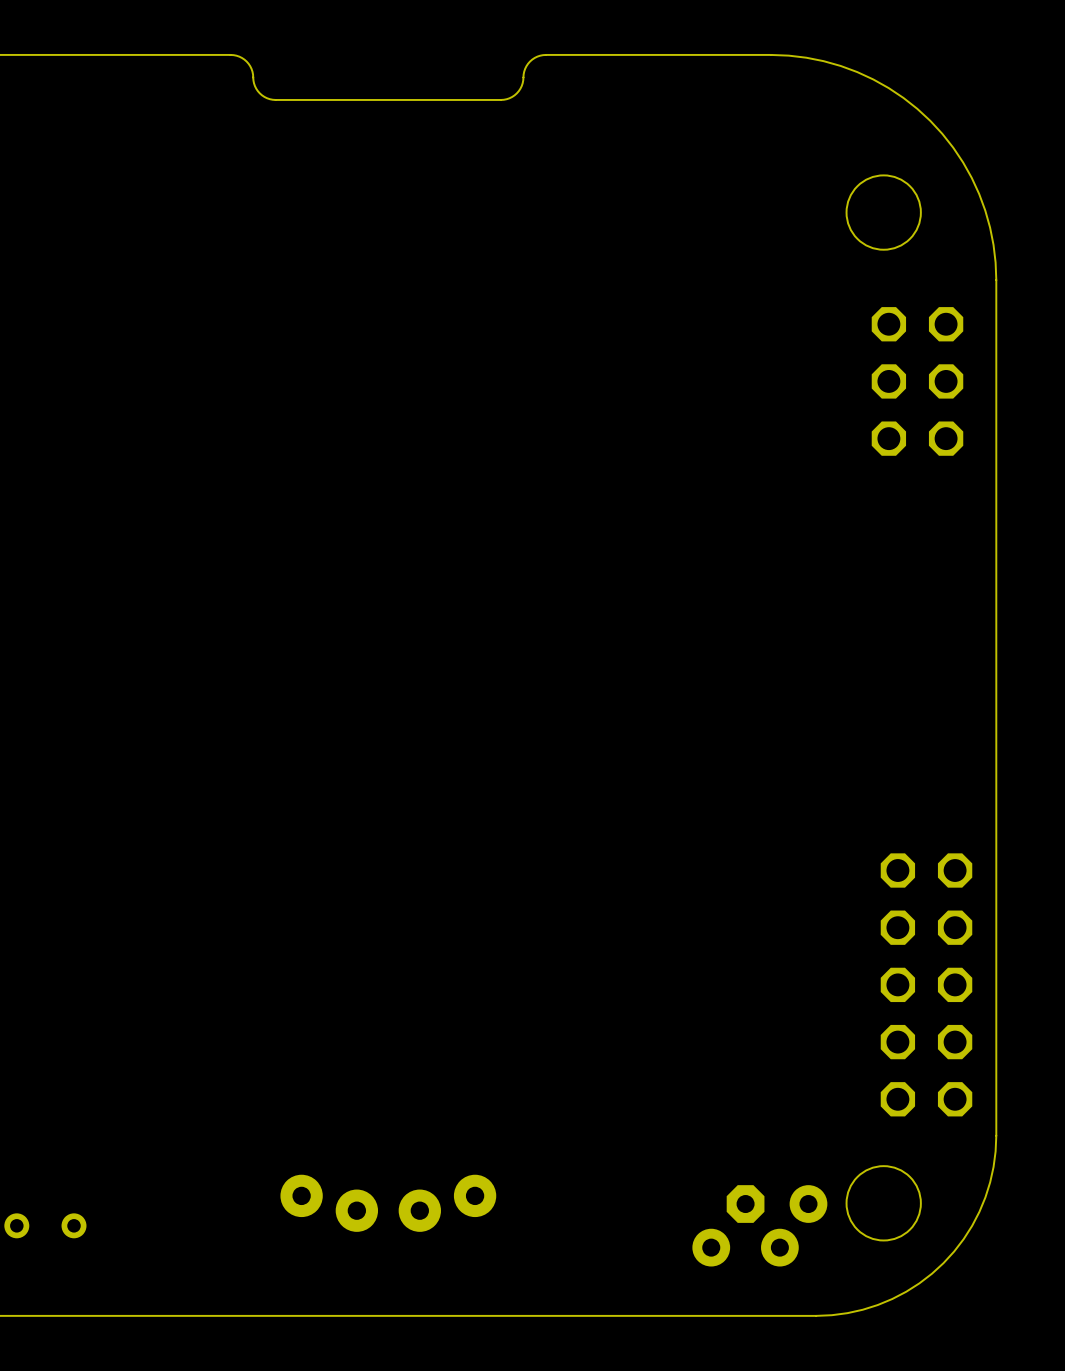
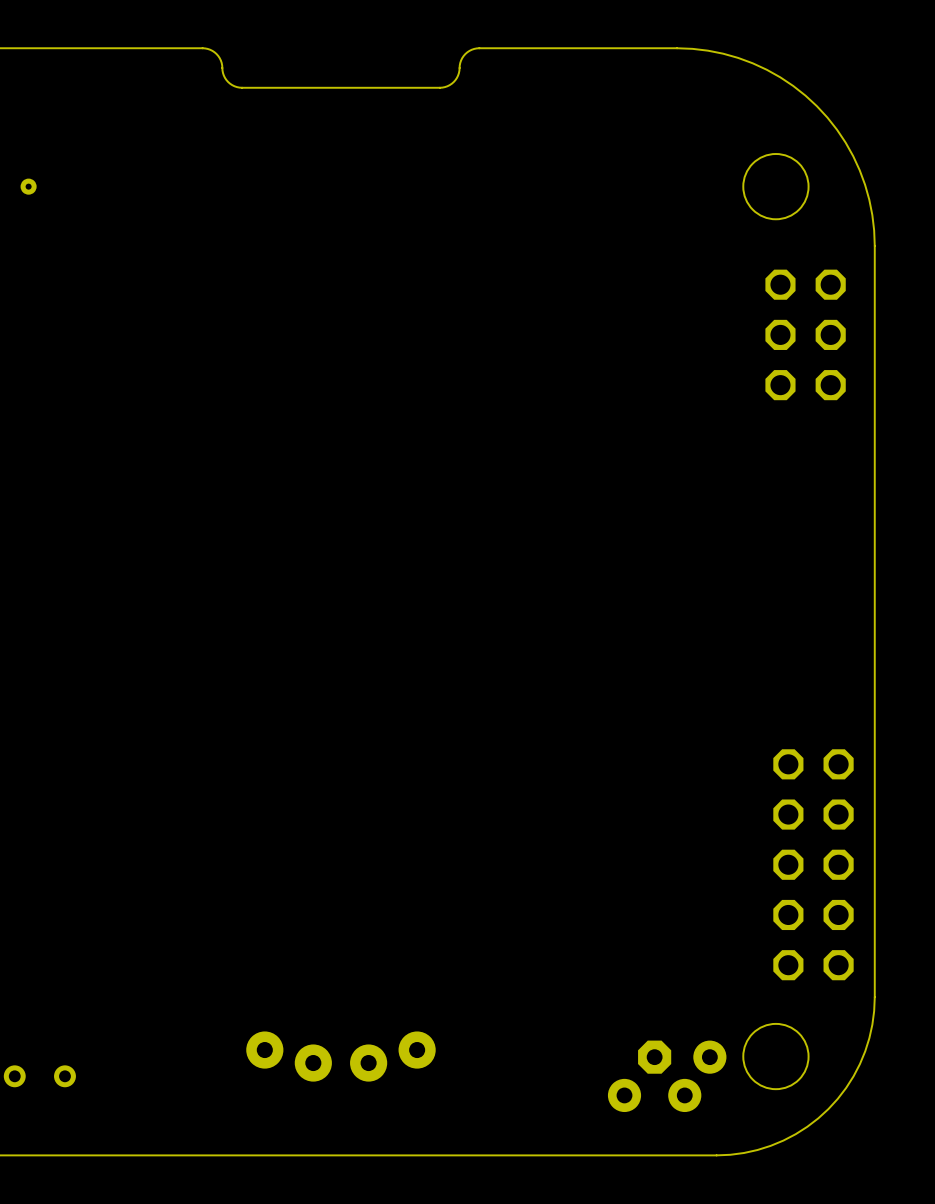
part: none -> (28, 186)

